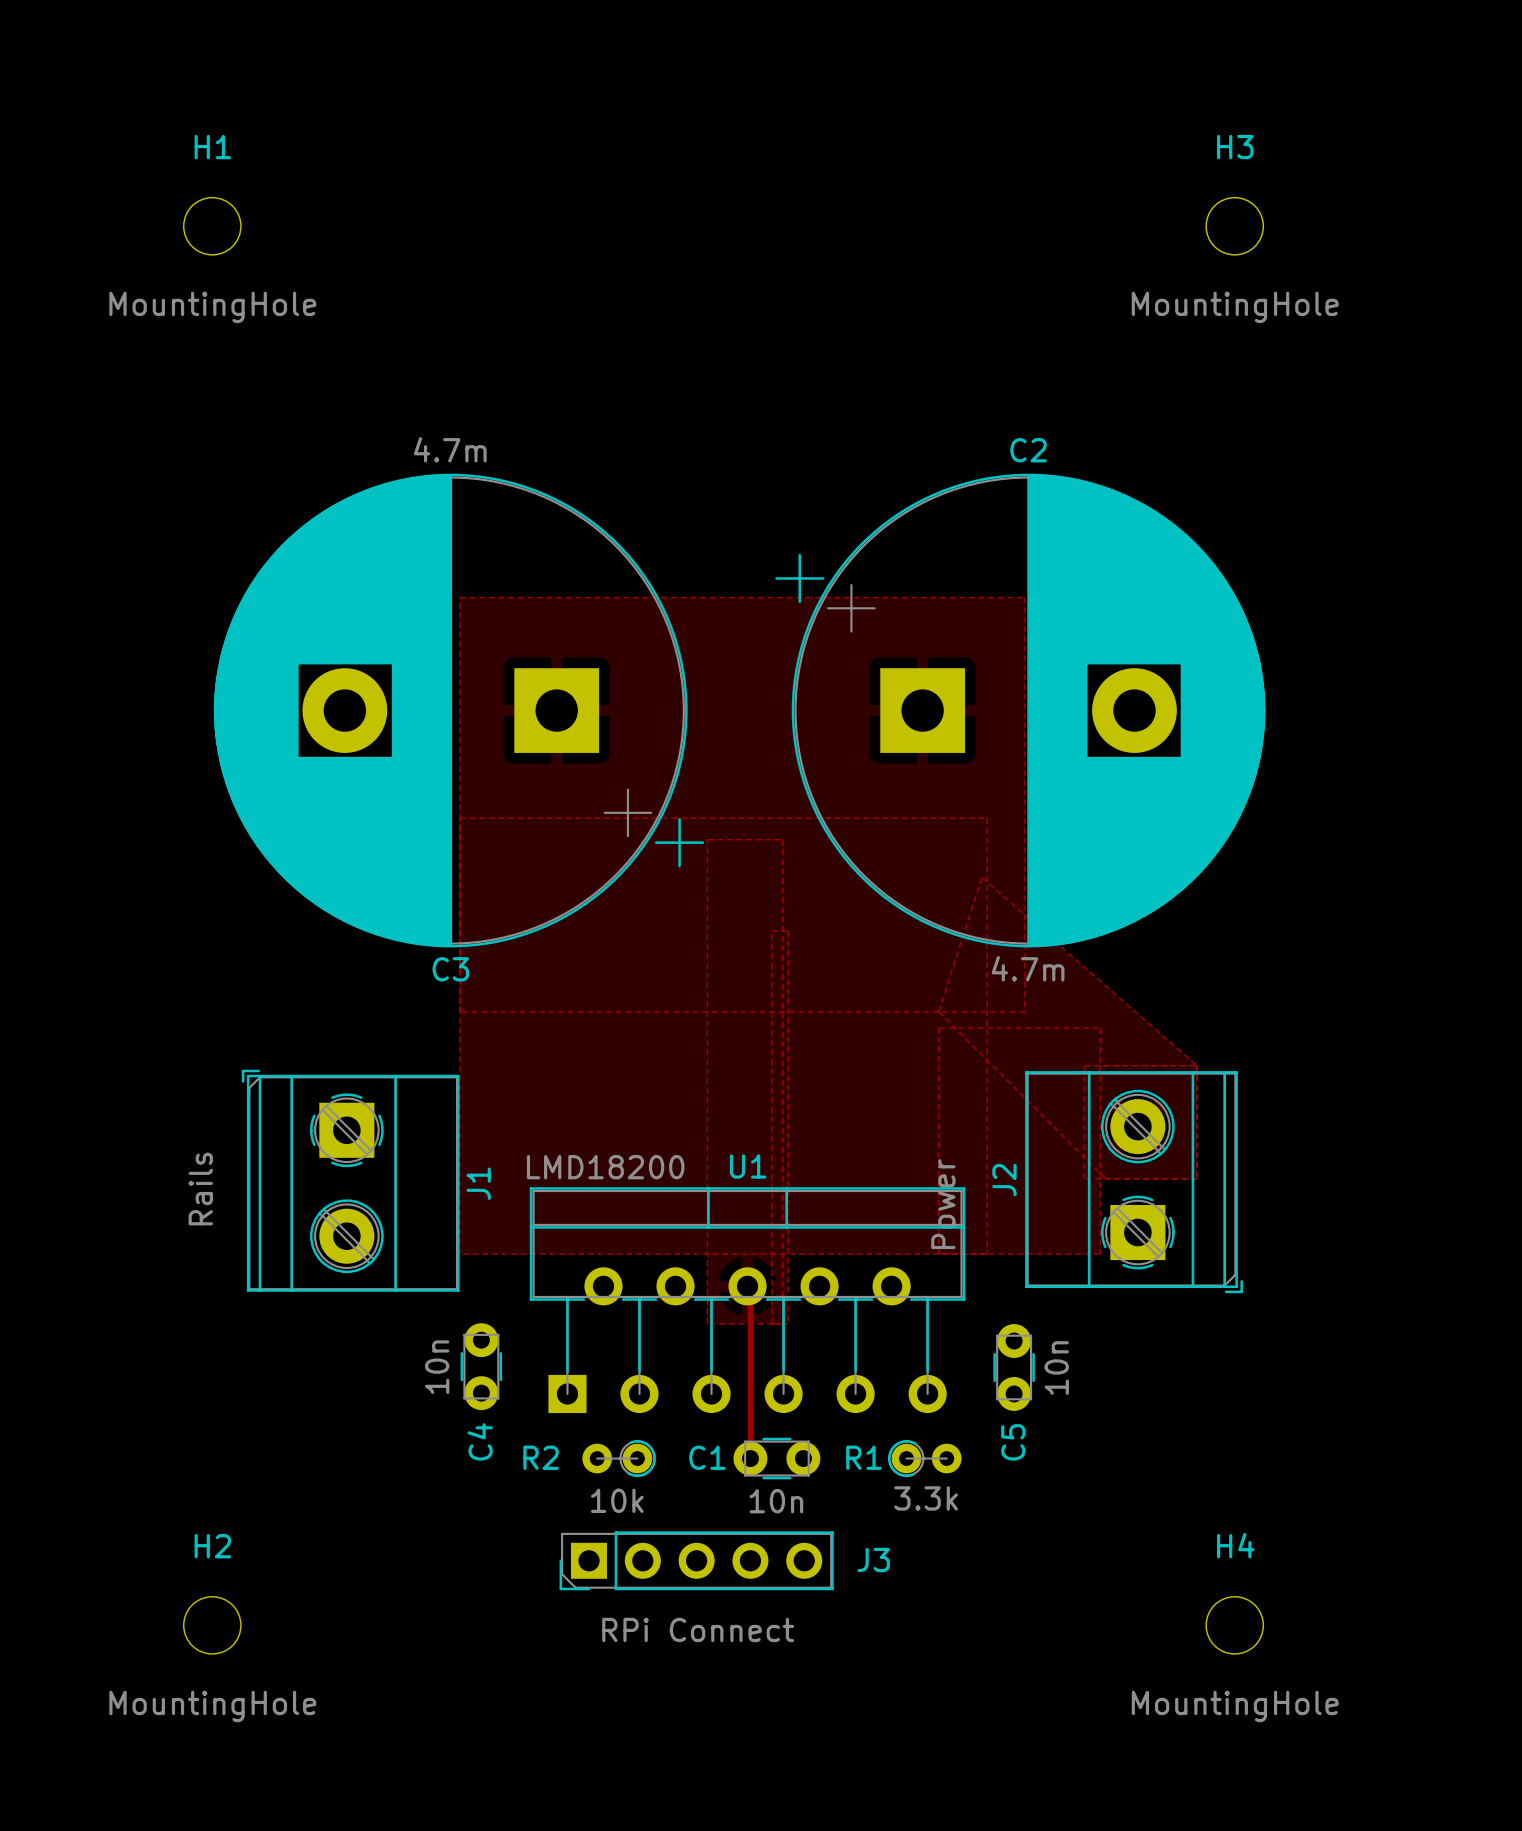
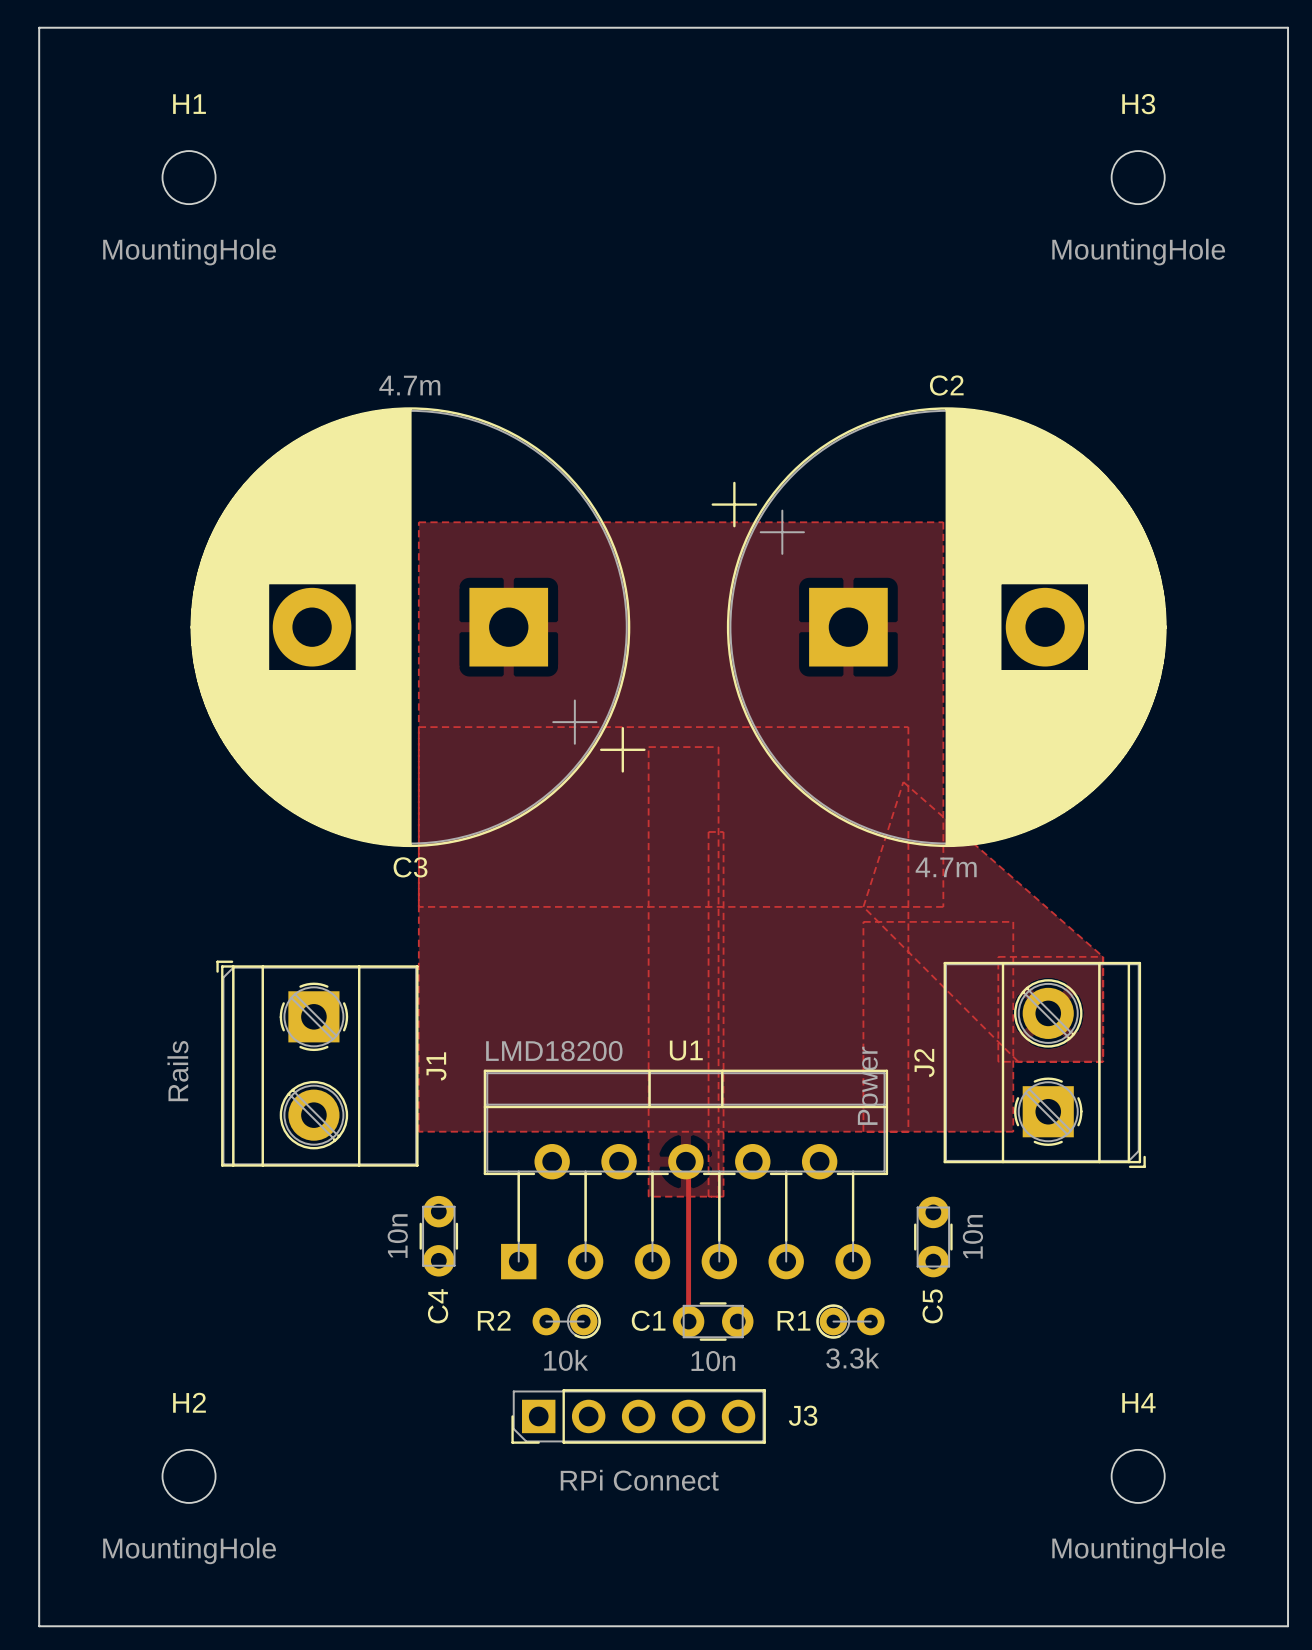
board edge: none -> (39, 27) (1288, 27) (1288, 1626) (39, 1626) (39, 27)

